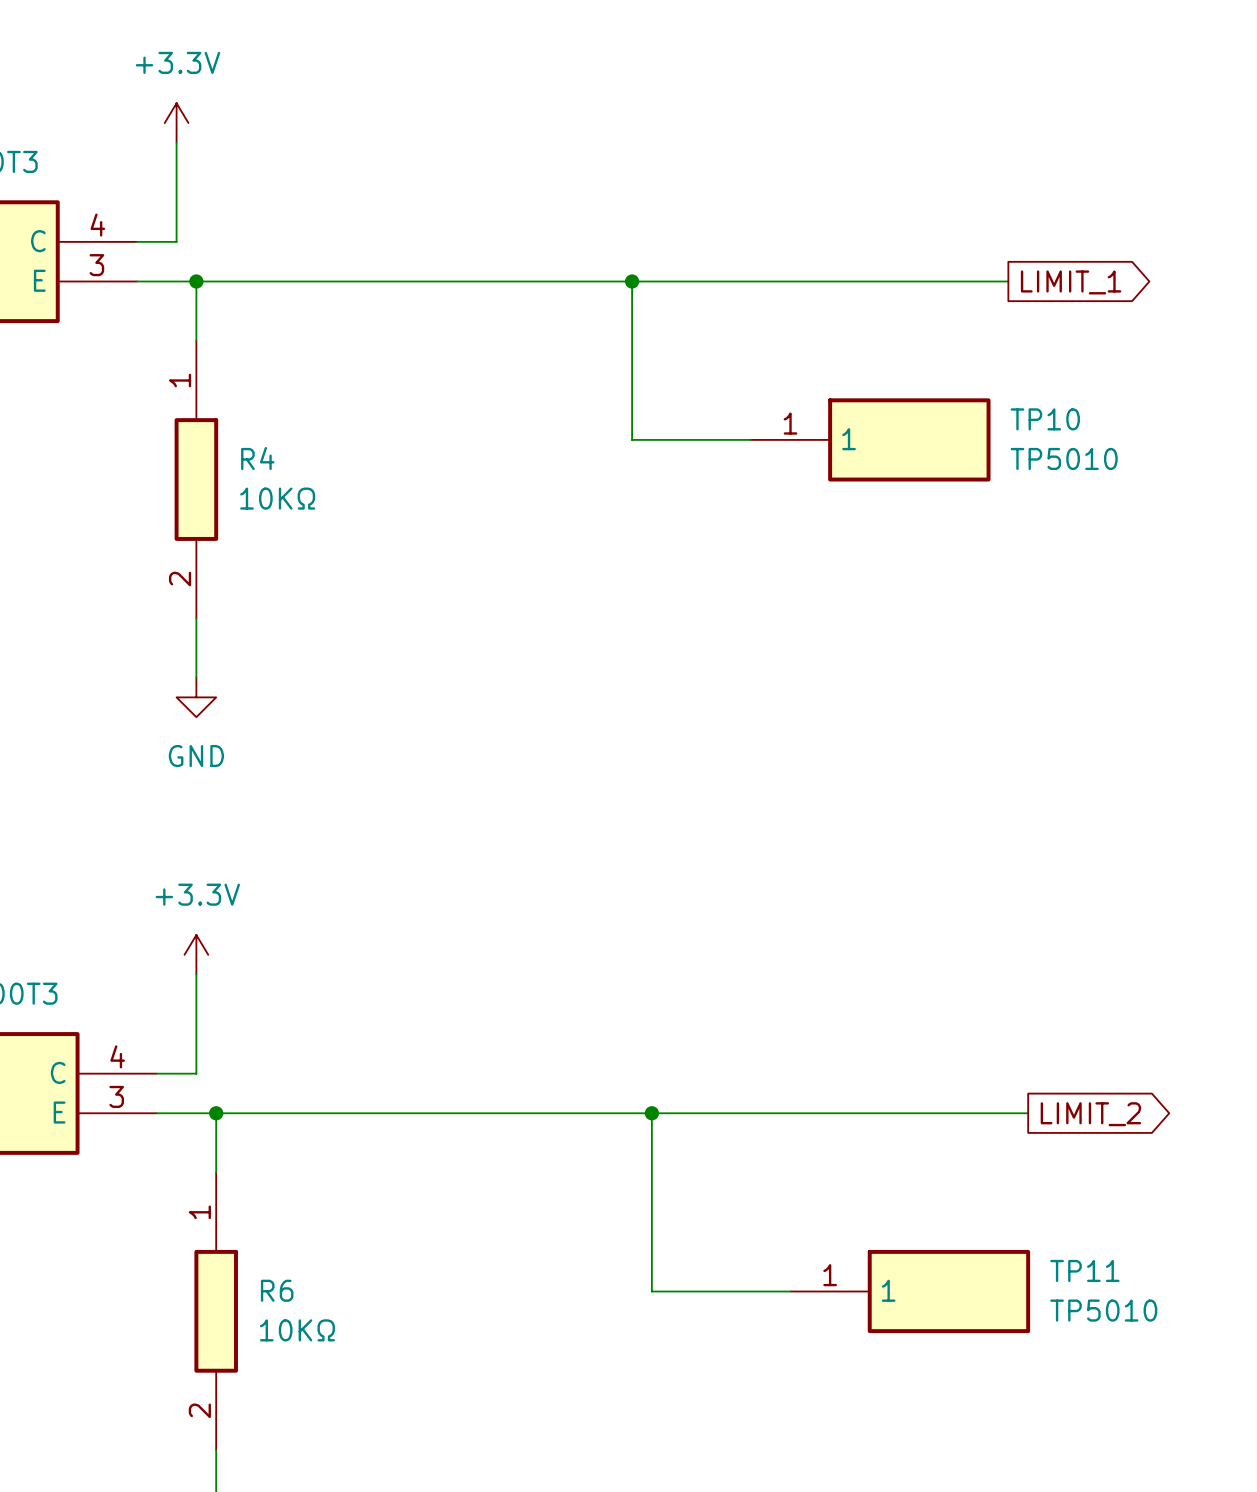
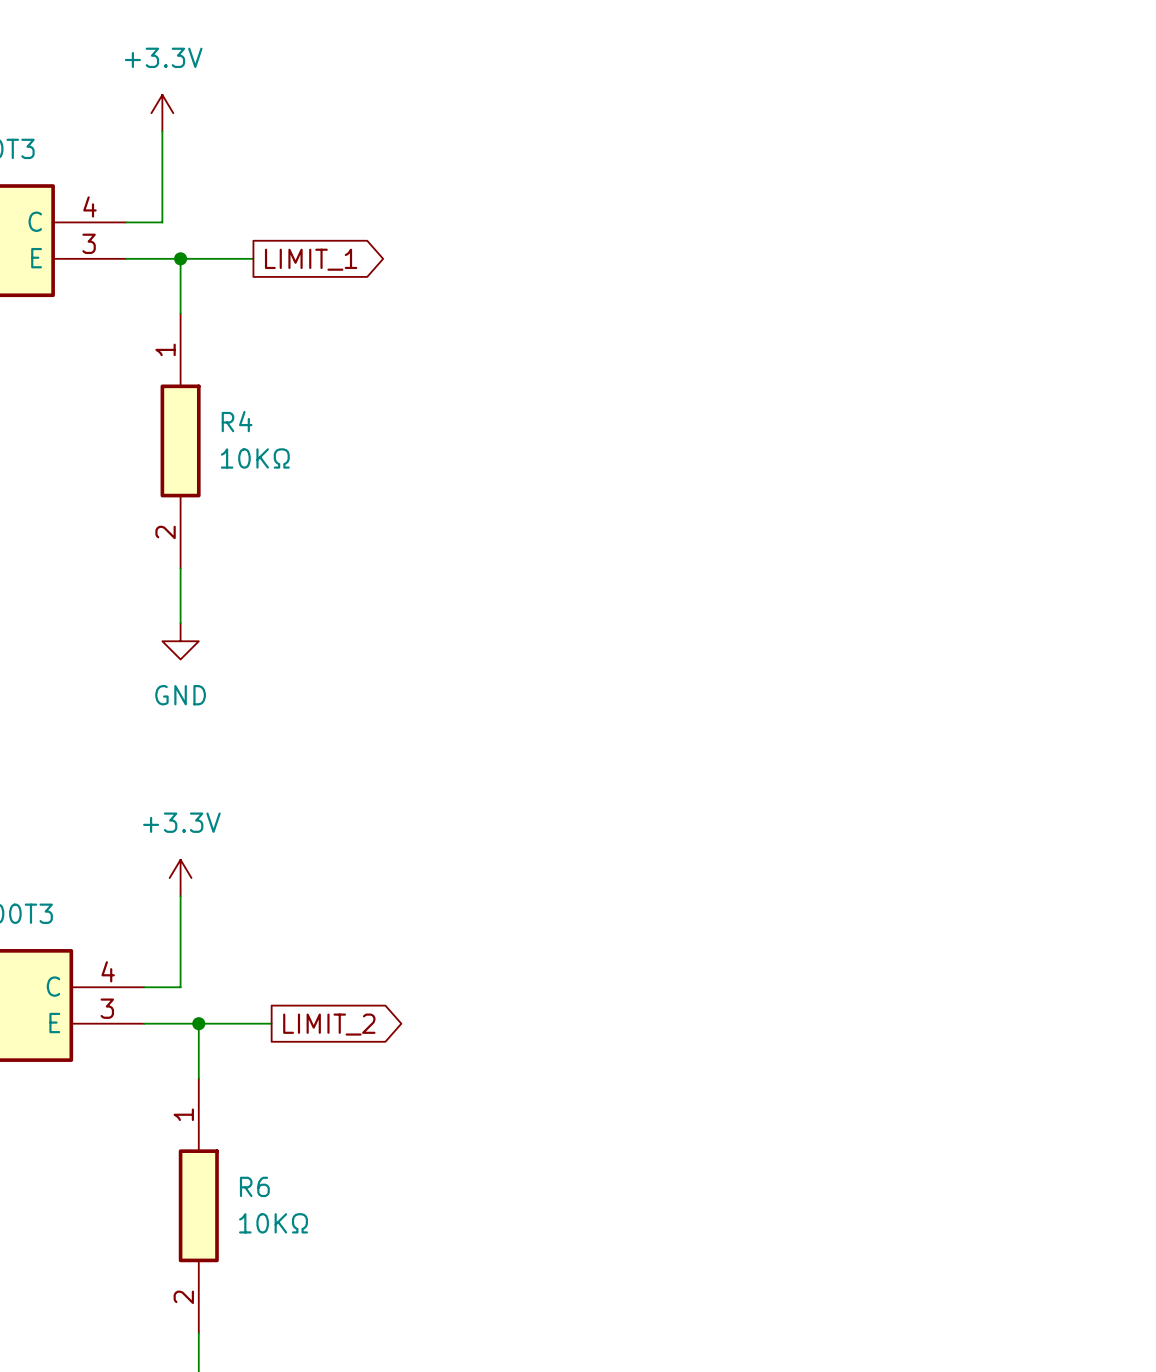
wire: (275, 281) (1008, 281) -> none
wire: (632, 281) (632, 439) (750, 439) -> none
junction: (632, 281) -> none
global label: none -> LIMIT_1 (311, 259)
global label: LIMIT_1 (1071, 282) -> none
TP10: TP5010 (870, 439) -> none
wire: (295, 1113) (1028, 1113) -> none
wire: (651, 1113) (651, 1291) (790, 1291) -> none
junction: (651, 1113) -> none
global label: none -> LIMIT_2 (329, 1024)
global label: LIMIT_2 (1090, 1114) -> none
TP11: TP5010 (910, 1291) -> none

